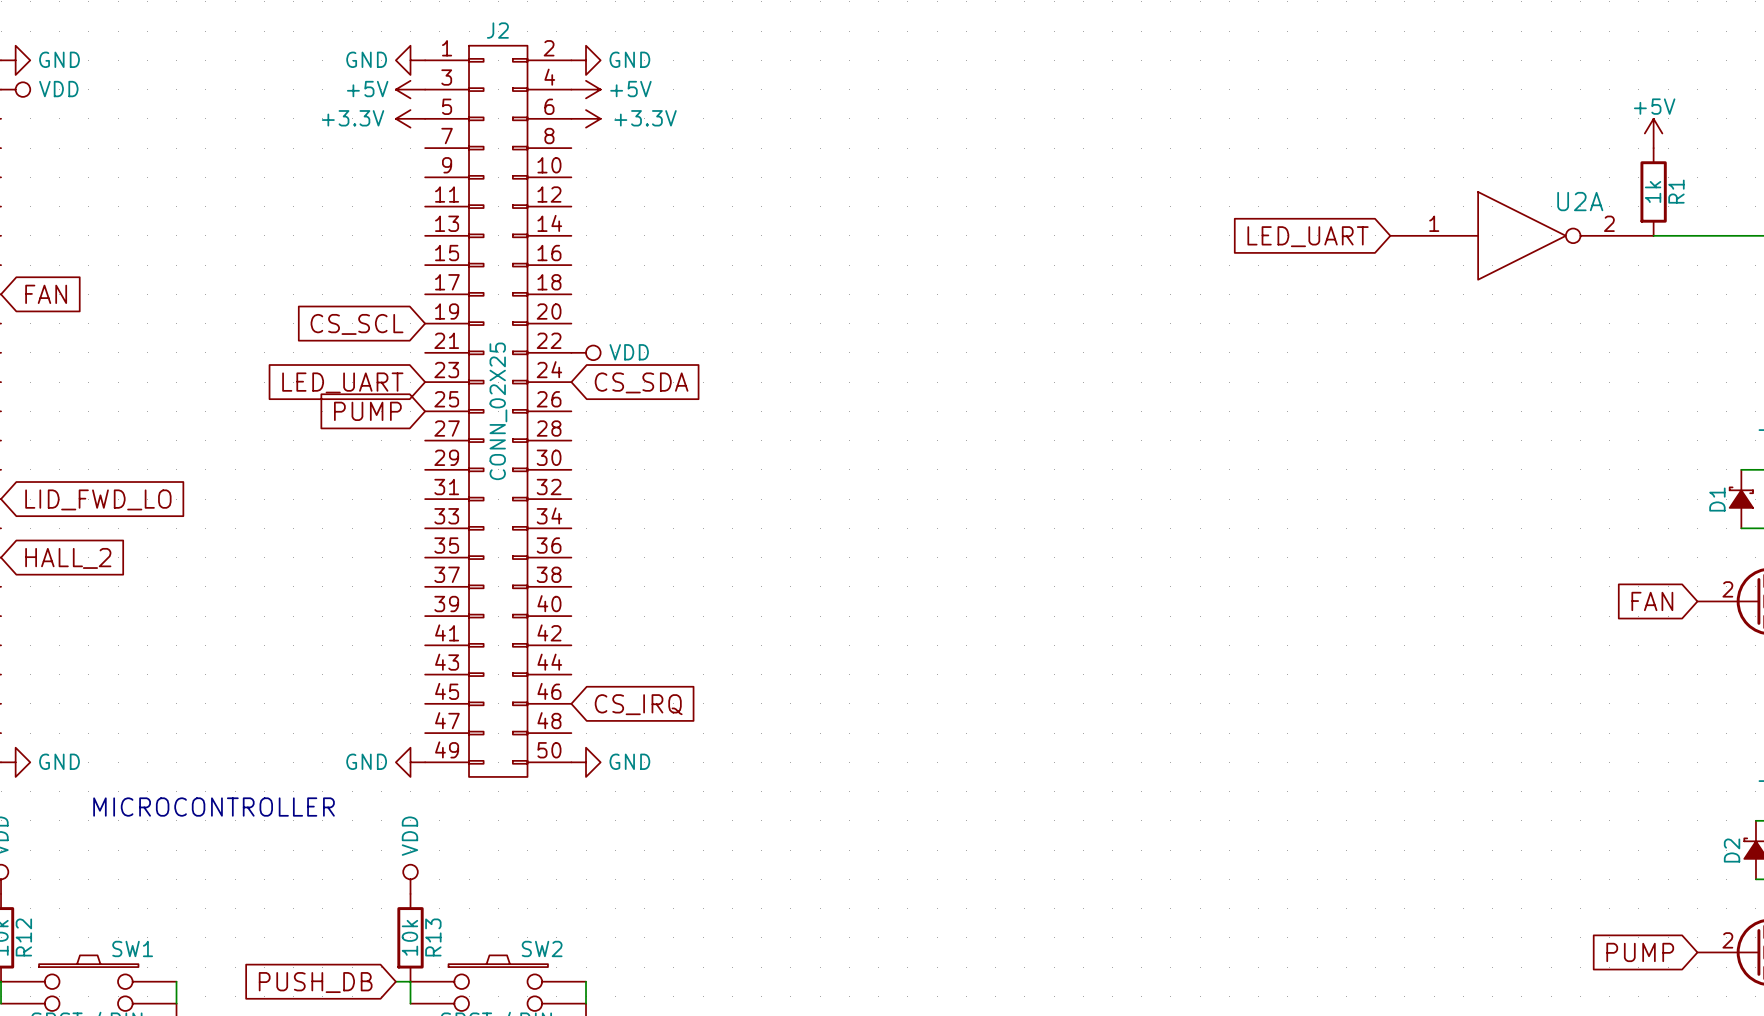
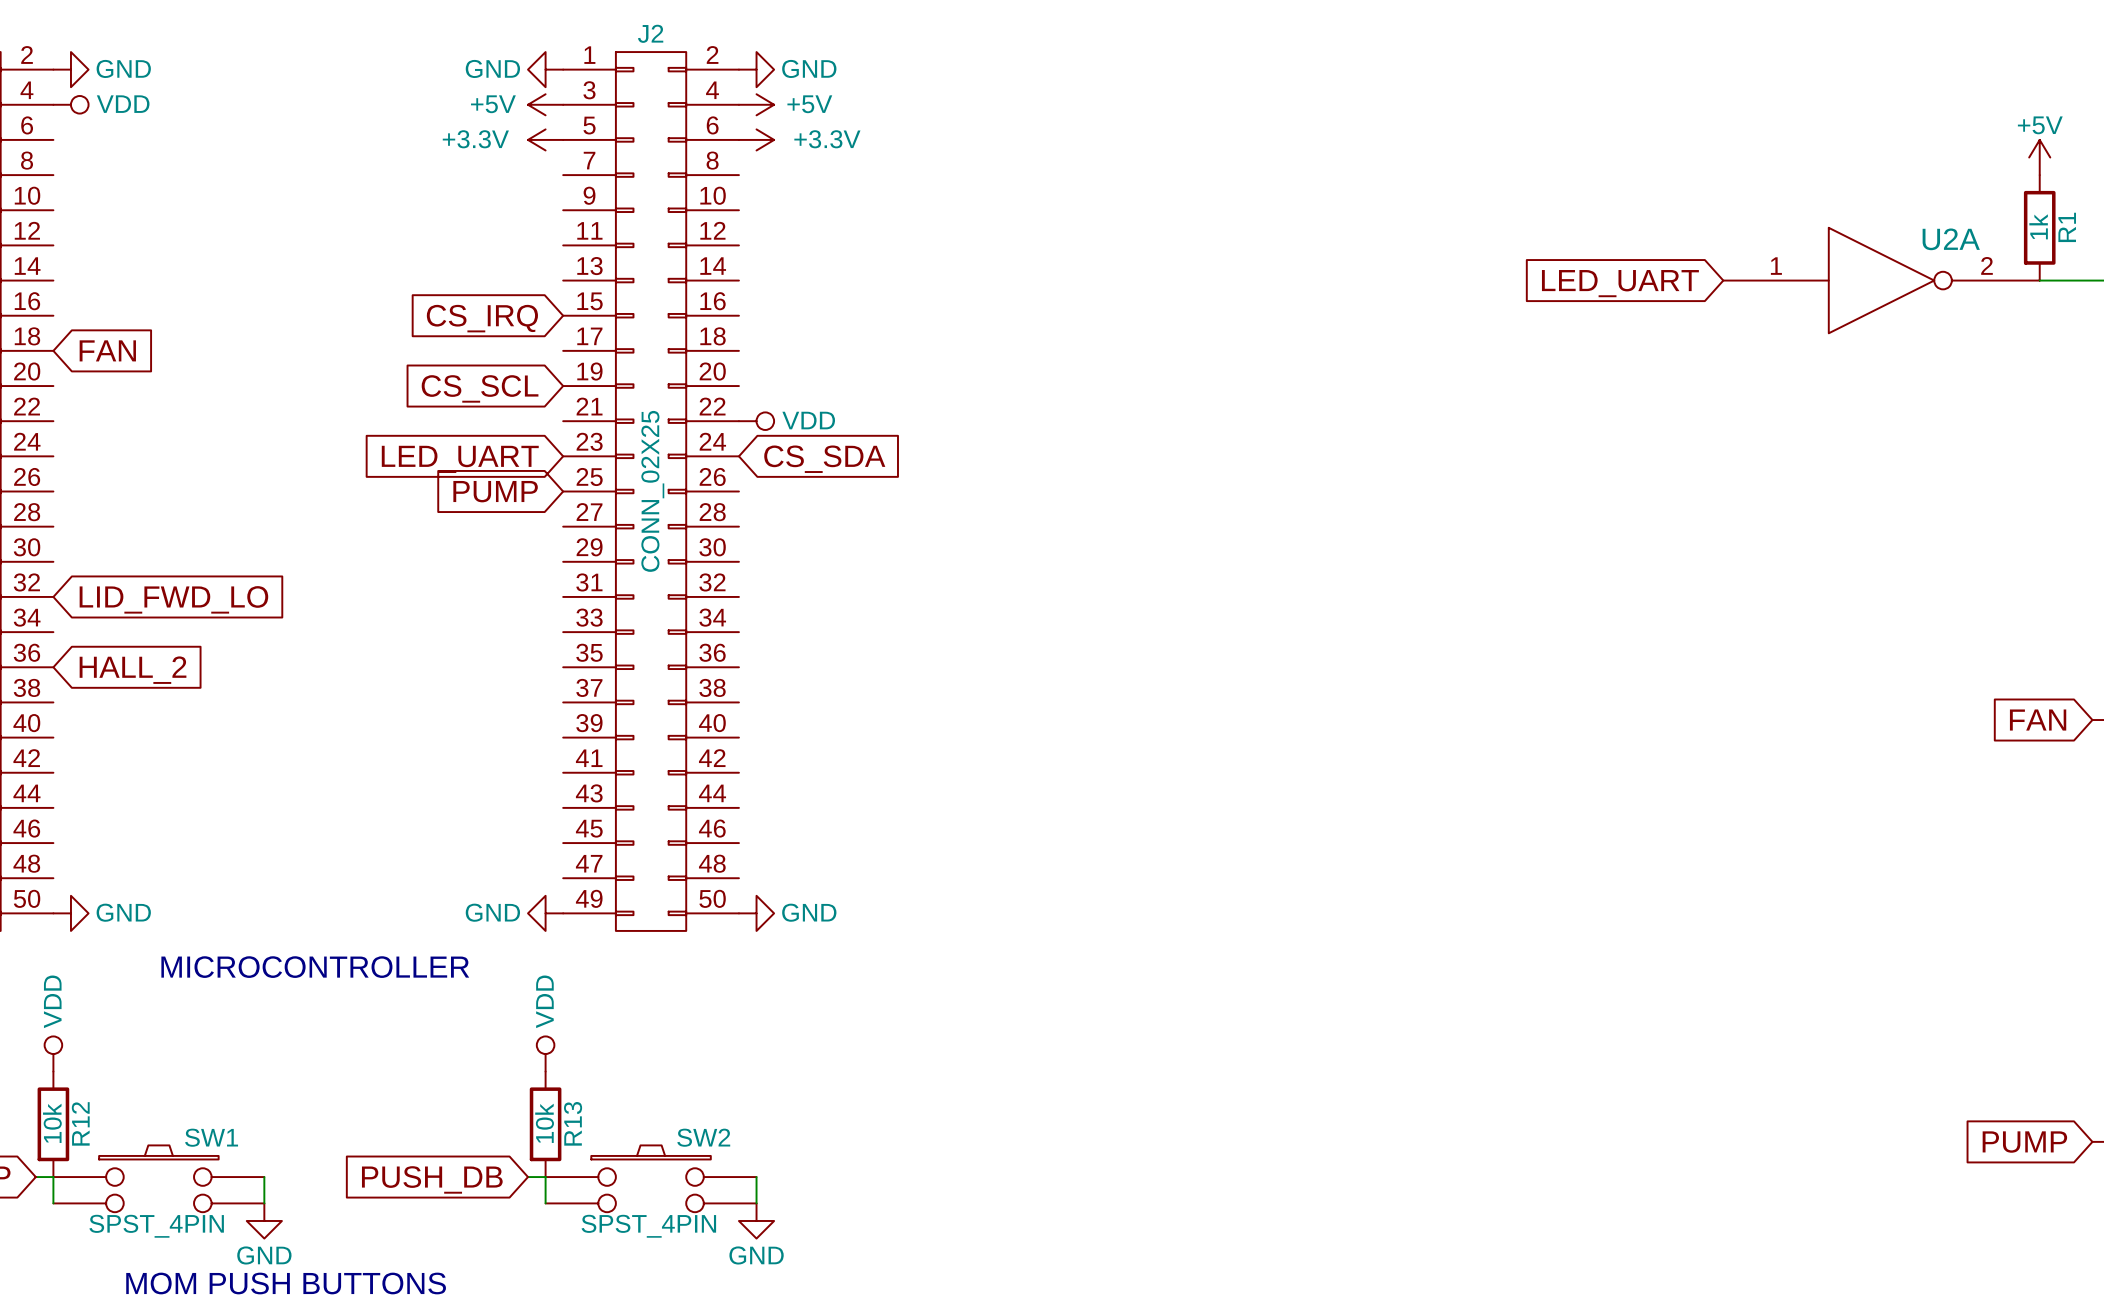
global label: none -> CS_IRQ (482, 318)
global label: CS_IRQ (638, 704) -> none

